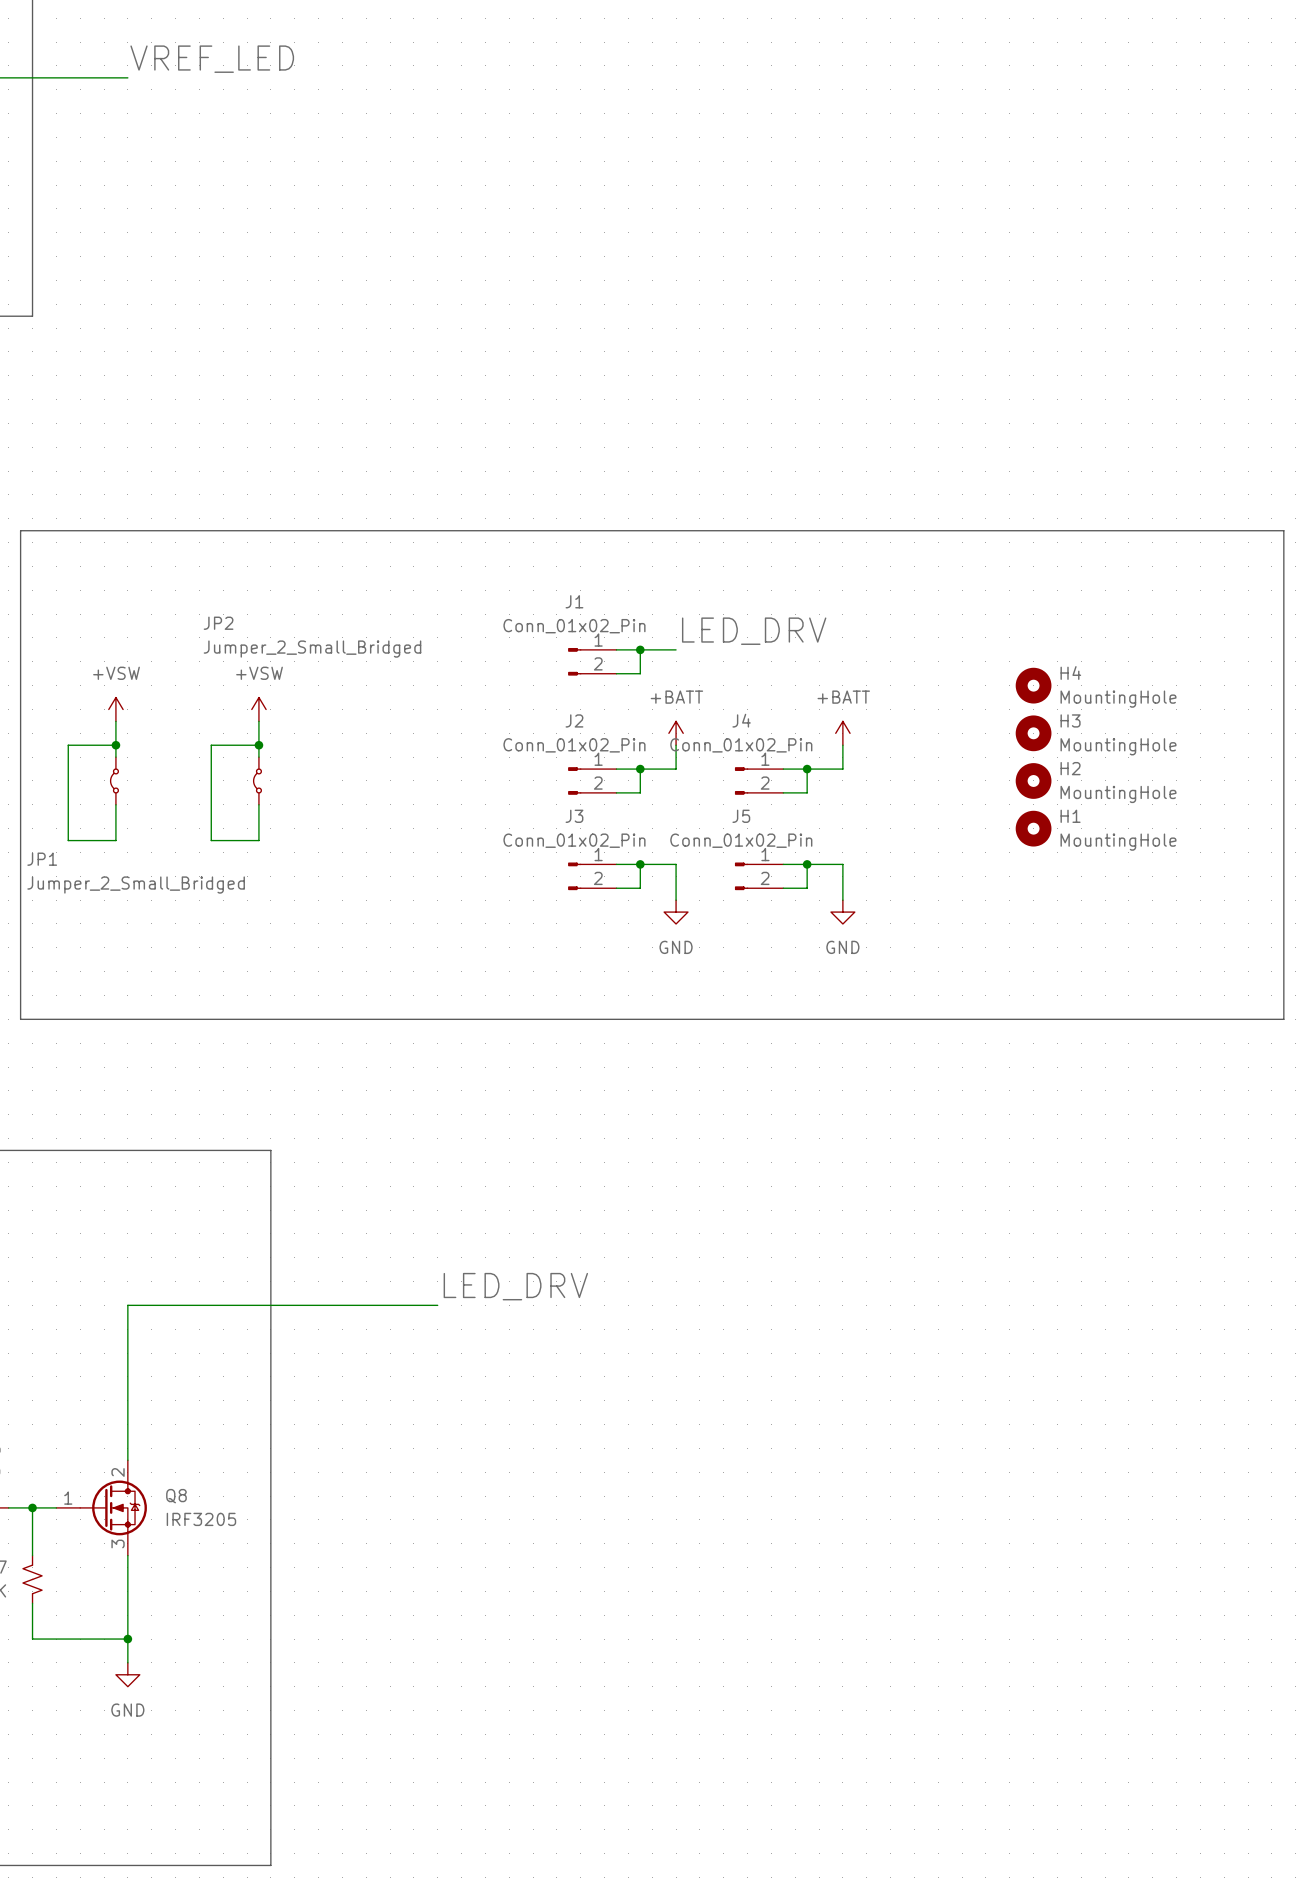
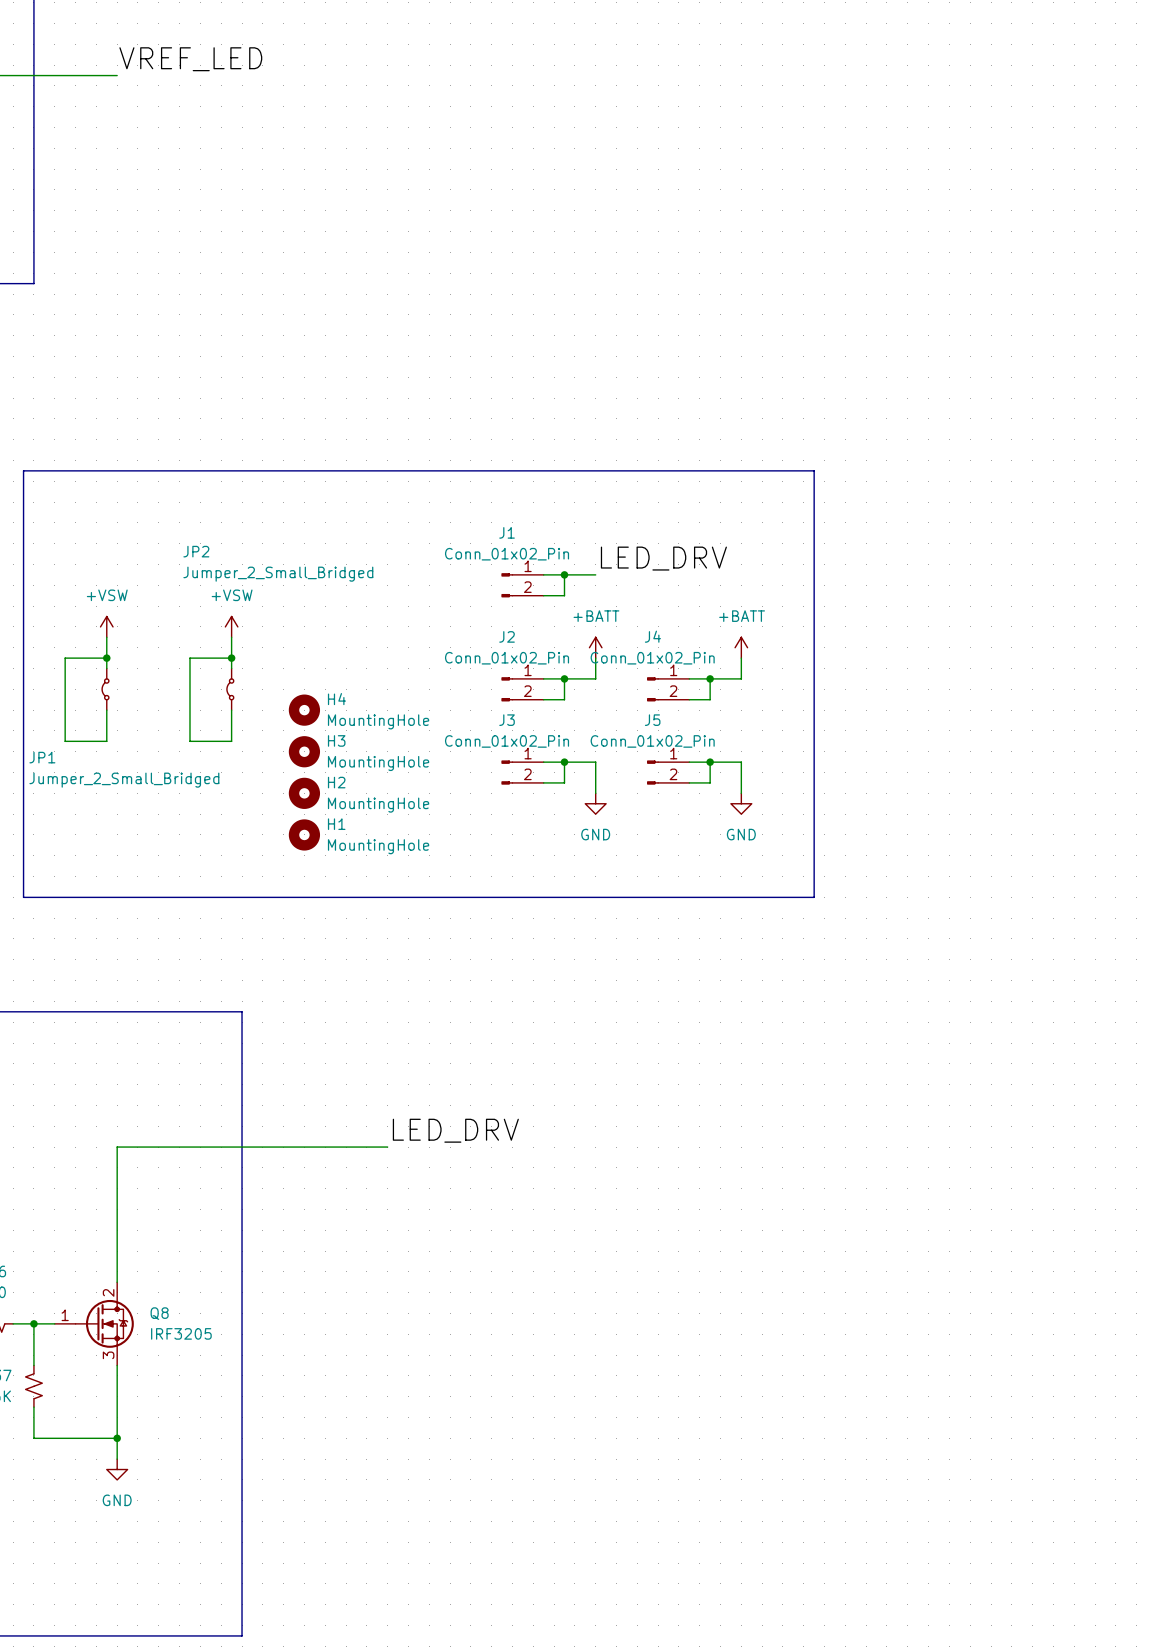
line: (926, 530) (1283, 530) (1283, 1019) (926, 1019) -> (814, 470) (814, 897)
H4 position: (1033, 685) -> (304, 710)
H3 position: (1033, 733) -> (304, 751)
H2 position: (1033, 780) -> (304, 793)
H1 position: (1033, 828) -> (304, 834)

